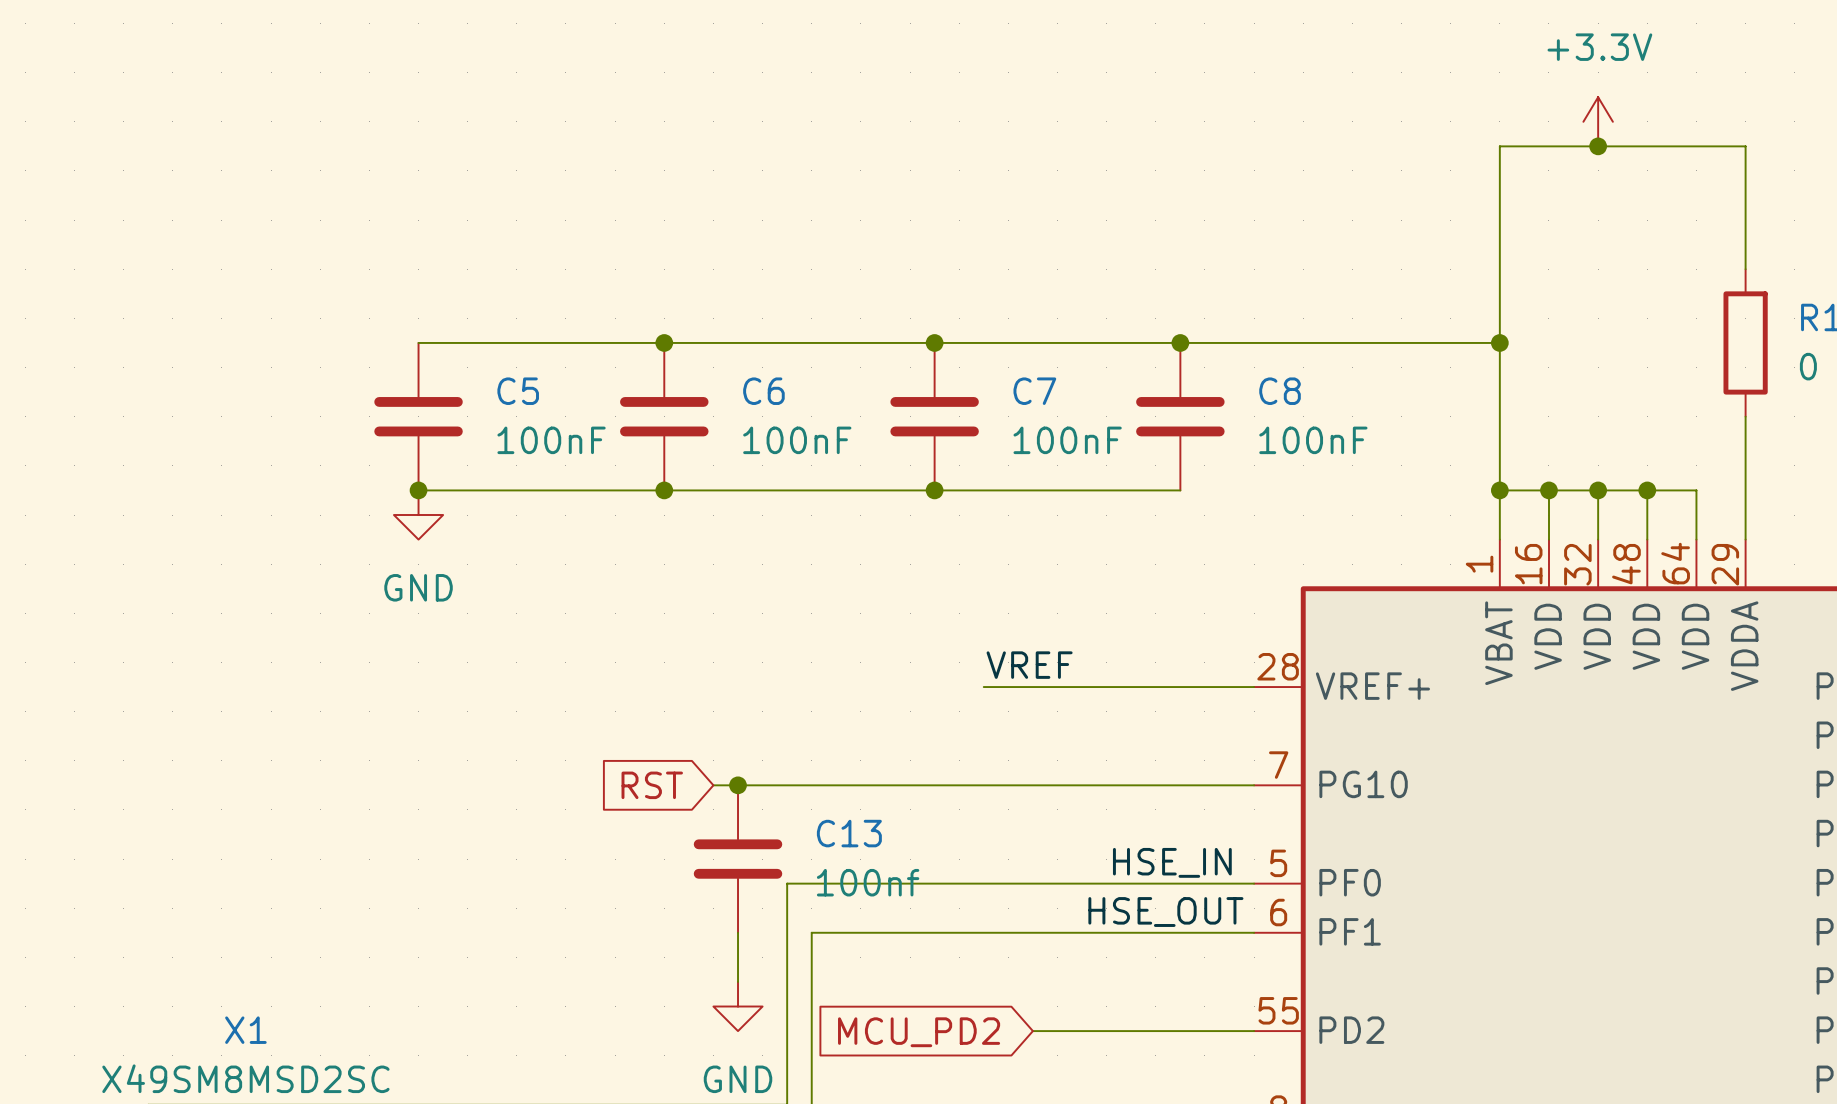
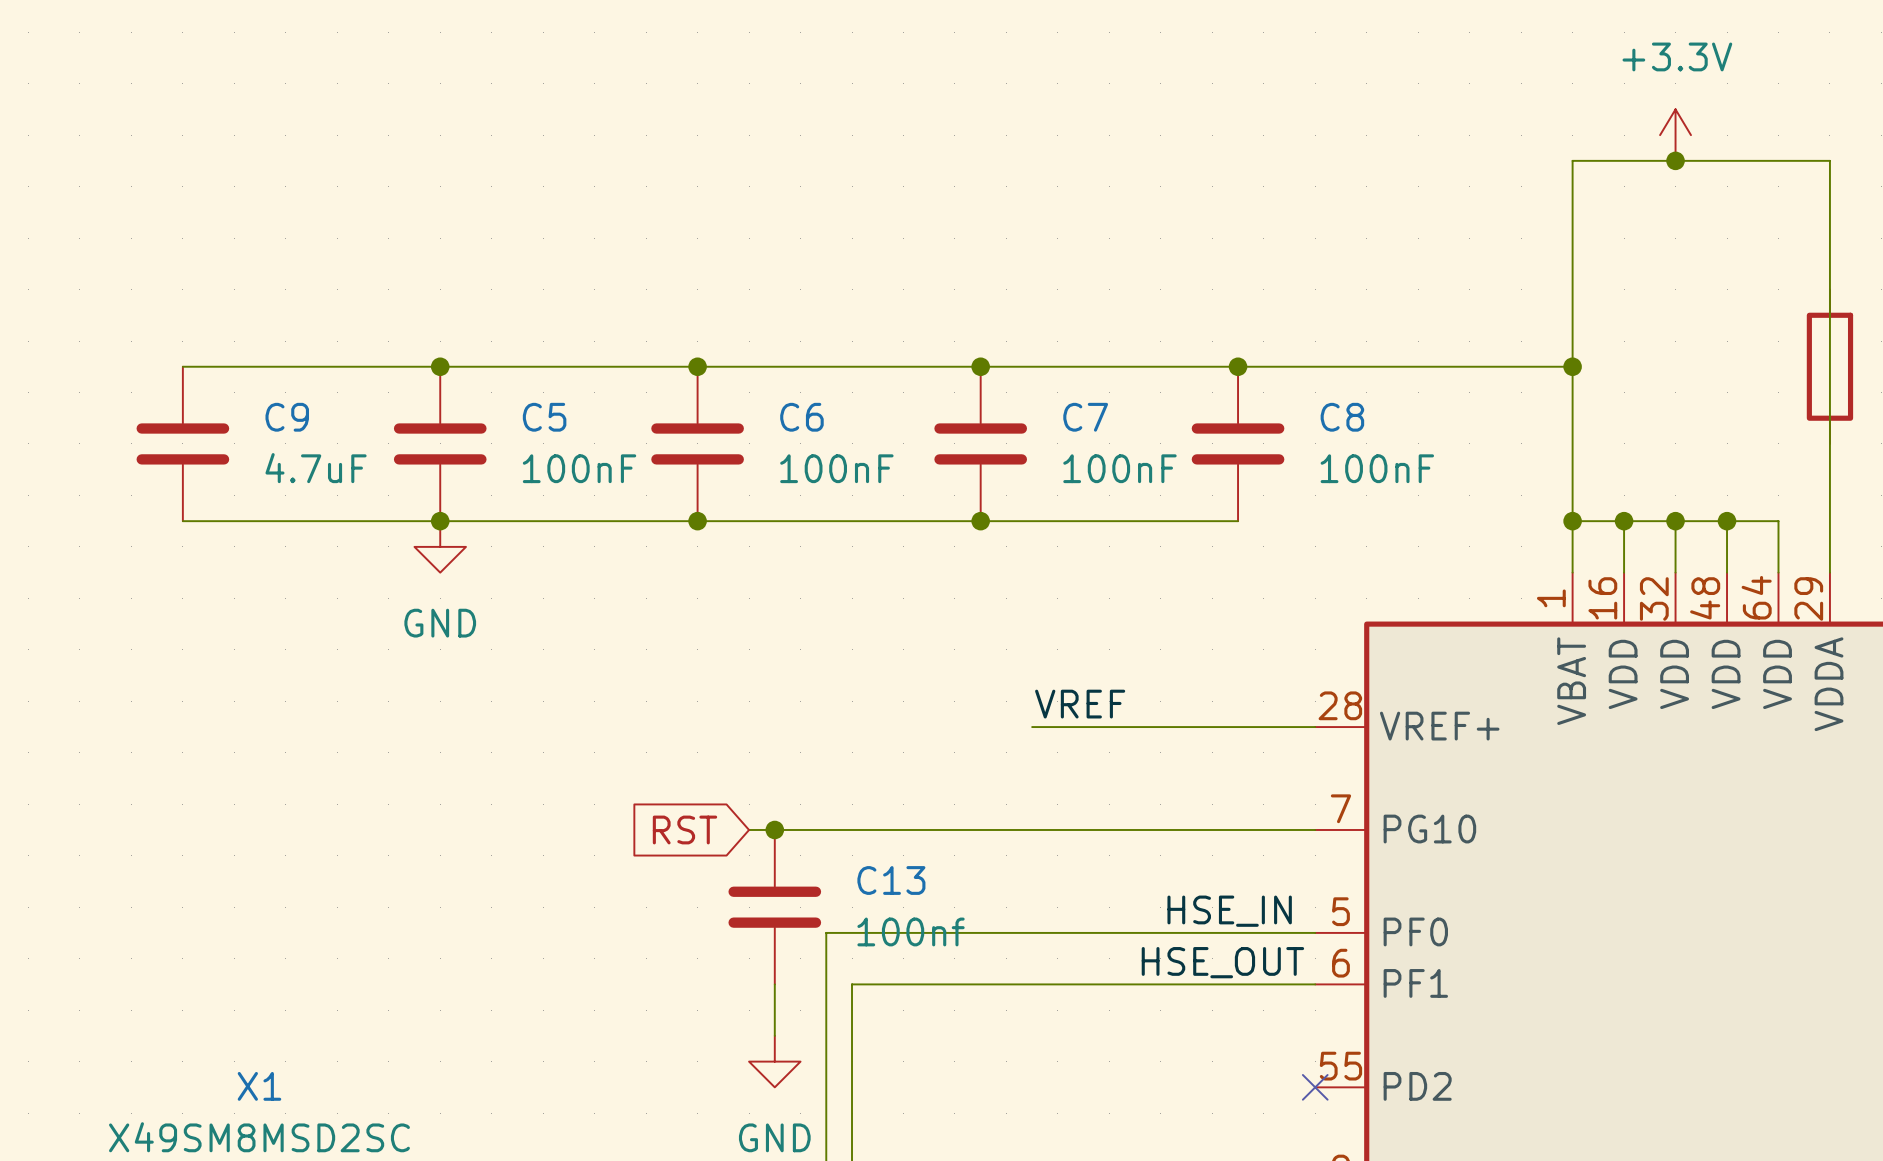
wire: none -> (1829, 289) (1829, 443)
wire: none -> (182, 366) (440, 366)
junction: none -> (440, 366)
C9: none -> 4.7uF (182, 443)
wire: none -> (182, 521) (440, 521)
wire: (1032, 1031) (1254, 1031) -> none
no-connect mark: none -> (1315, 1087)
global label: MCU_PD2 (919, 1032) -> none

